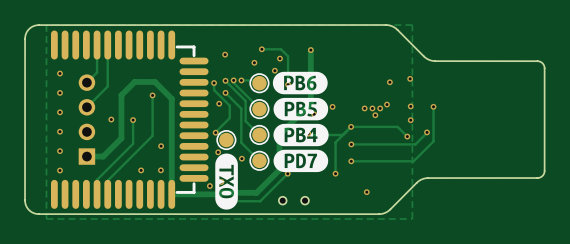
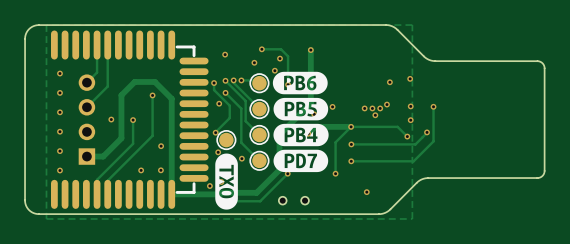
track: none -> (351, 126) (315, 126) (308, 133)
track: (342, 135) (309, 135) -> none

